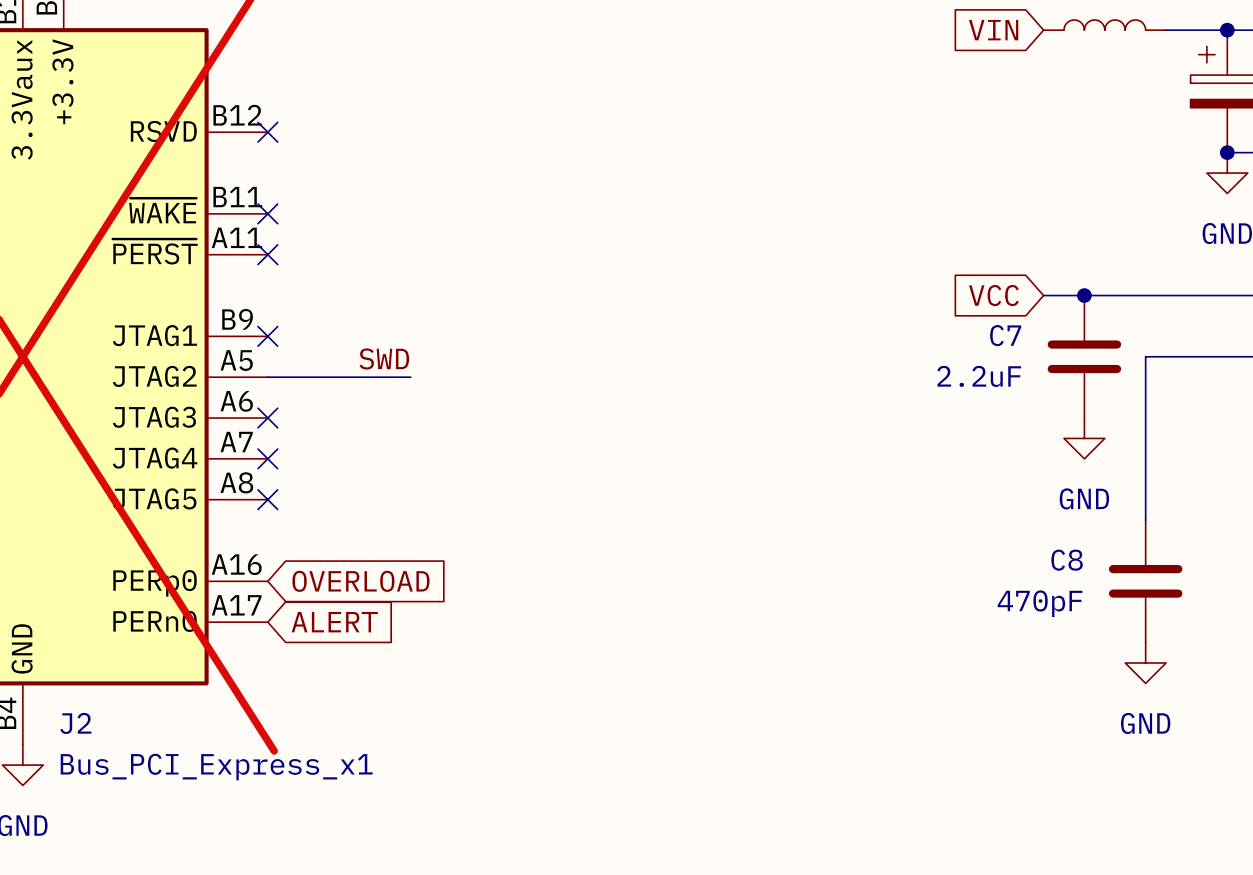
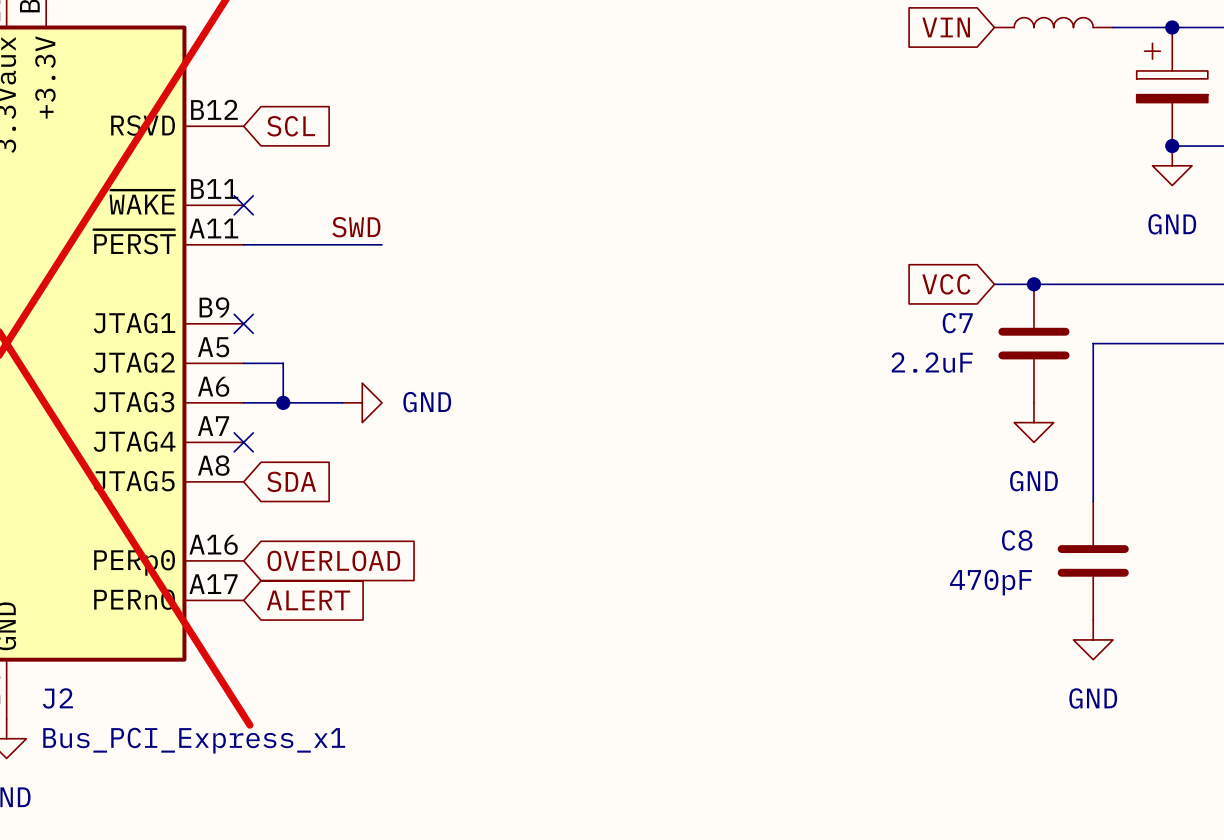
no-connect mark: (267, 132) -> none
global label: none -> SCL (291, 126)
wire: none -> (243, 244) (382, 244)
no-connect mark: (267, 254) -> none
label position: SWD (384, 358) -> SWD (356, 227)
wire: (308, 377) (410, 377) -> (283, 363) (283, 402)
wire: none -> (243, 402) (342, 402)
no-connect mark: (267, 418) -> none
junction: none -> (283, 402)
power symbol: none -> GND (362, 402)
no-connect mark: (267, 499) -> none
global label: none -> SDA (291, 481)

